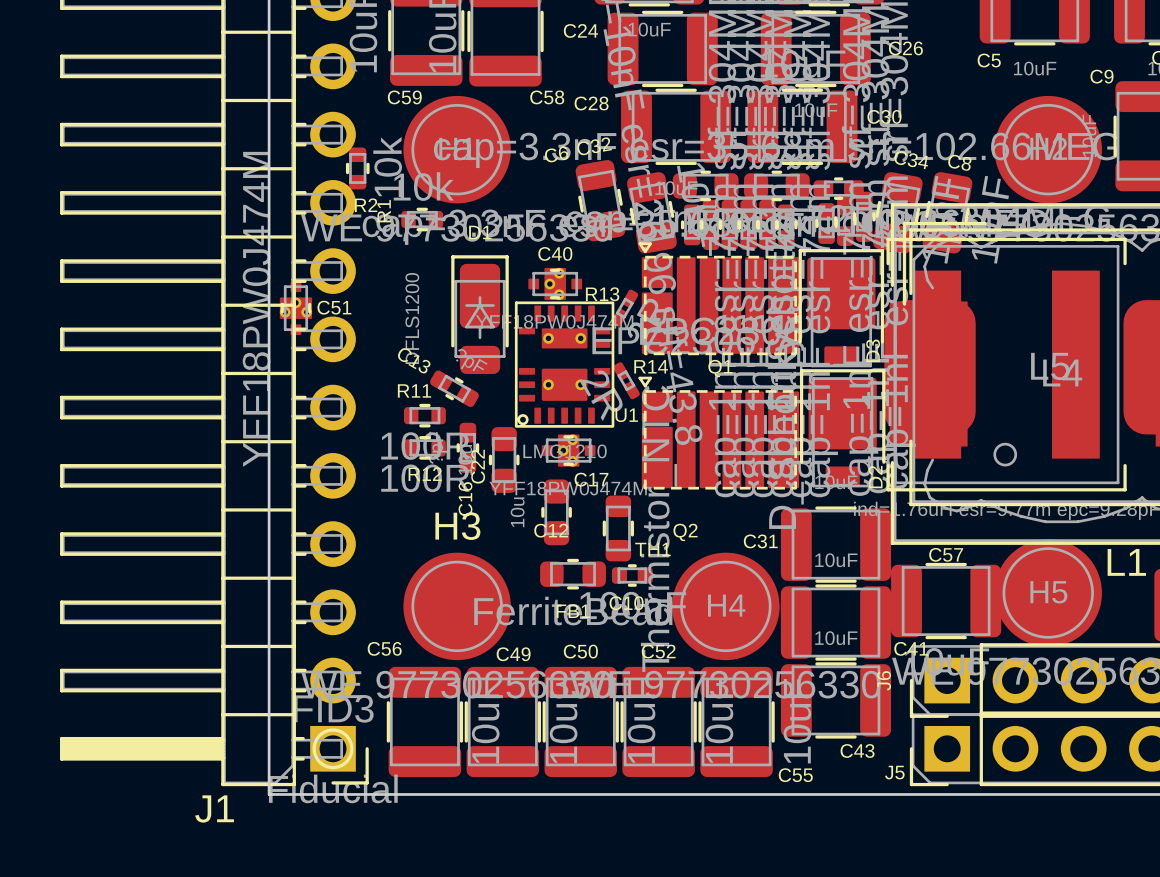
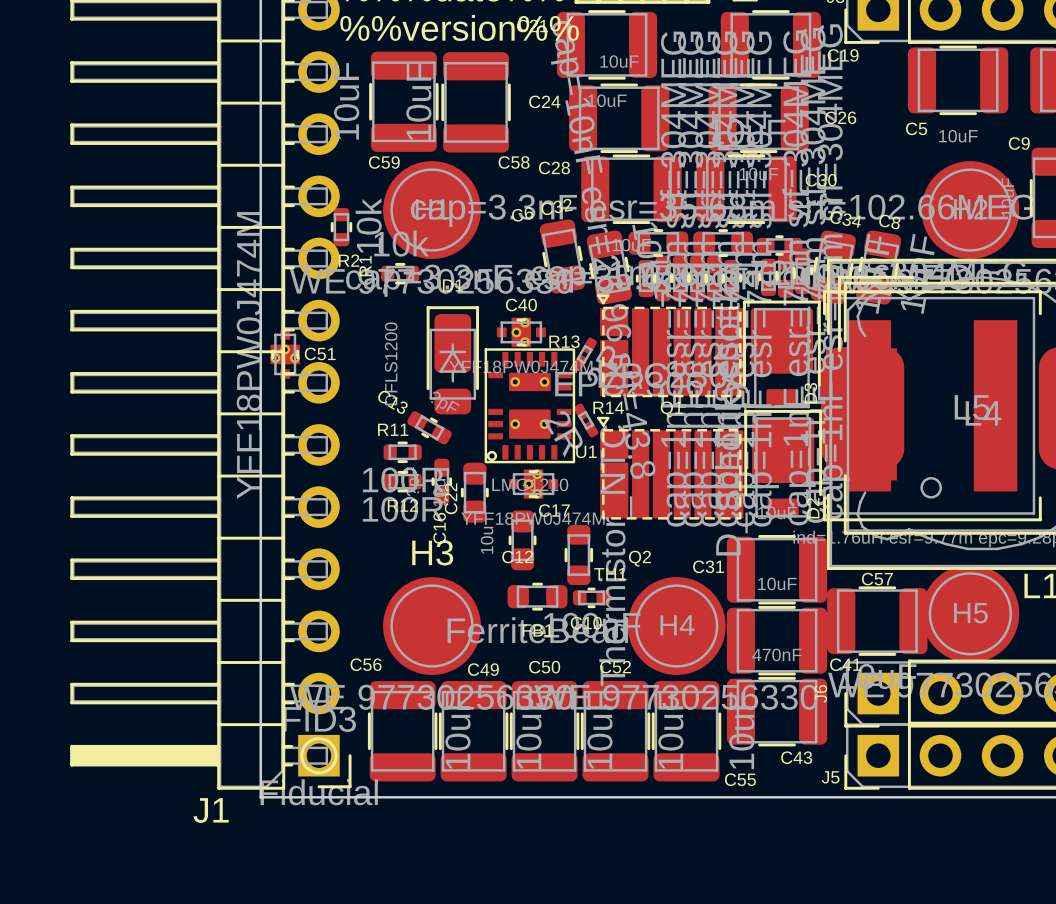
C43 value: 10uF (836, 638) -> 470nF (776, 654)

